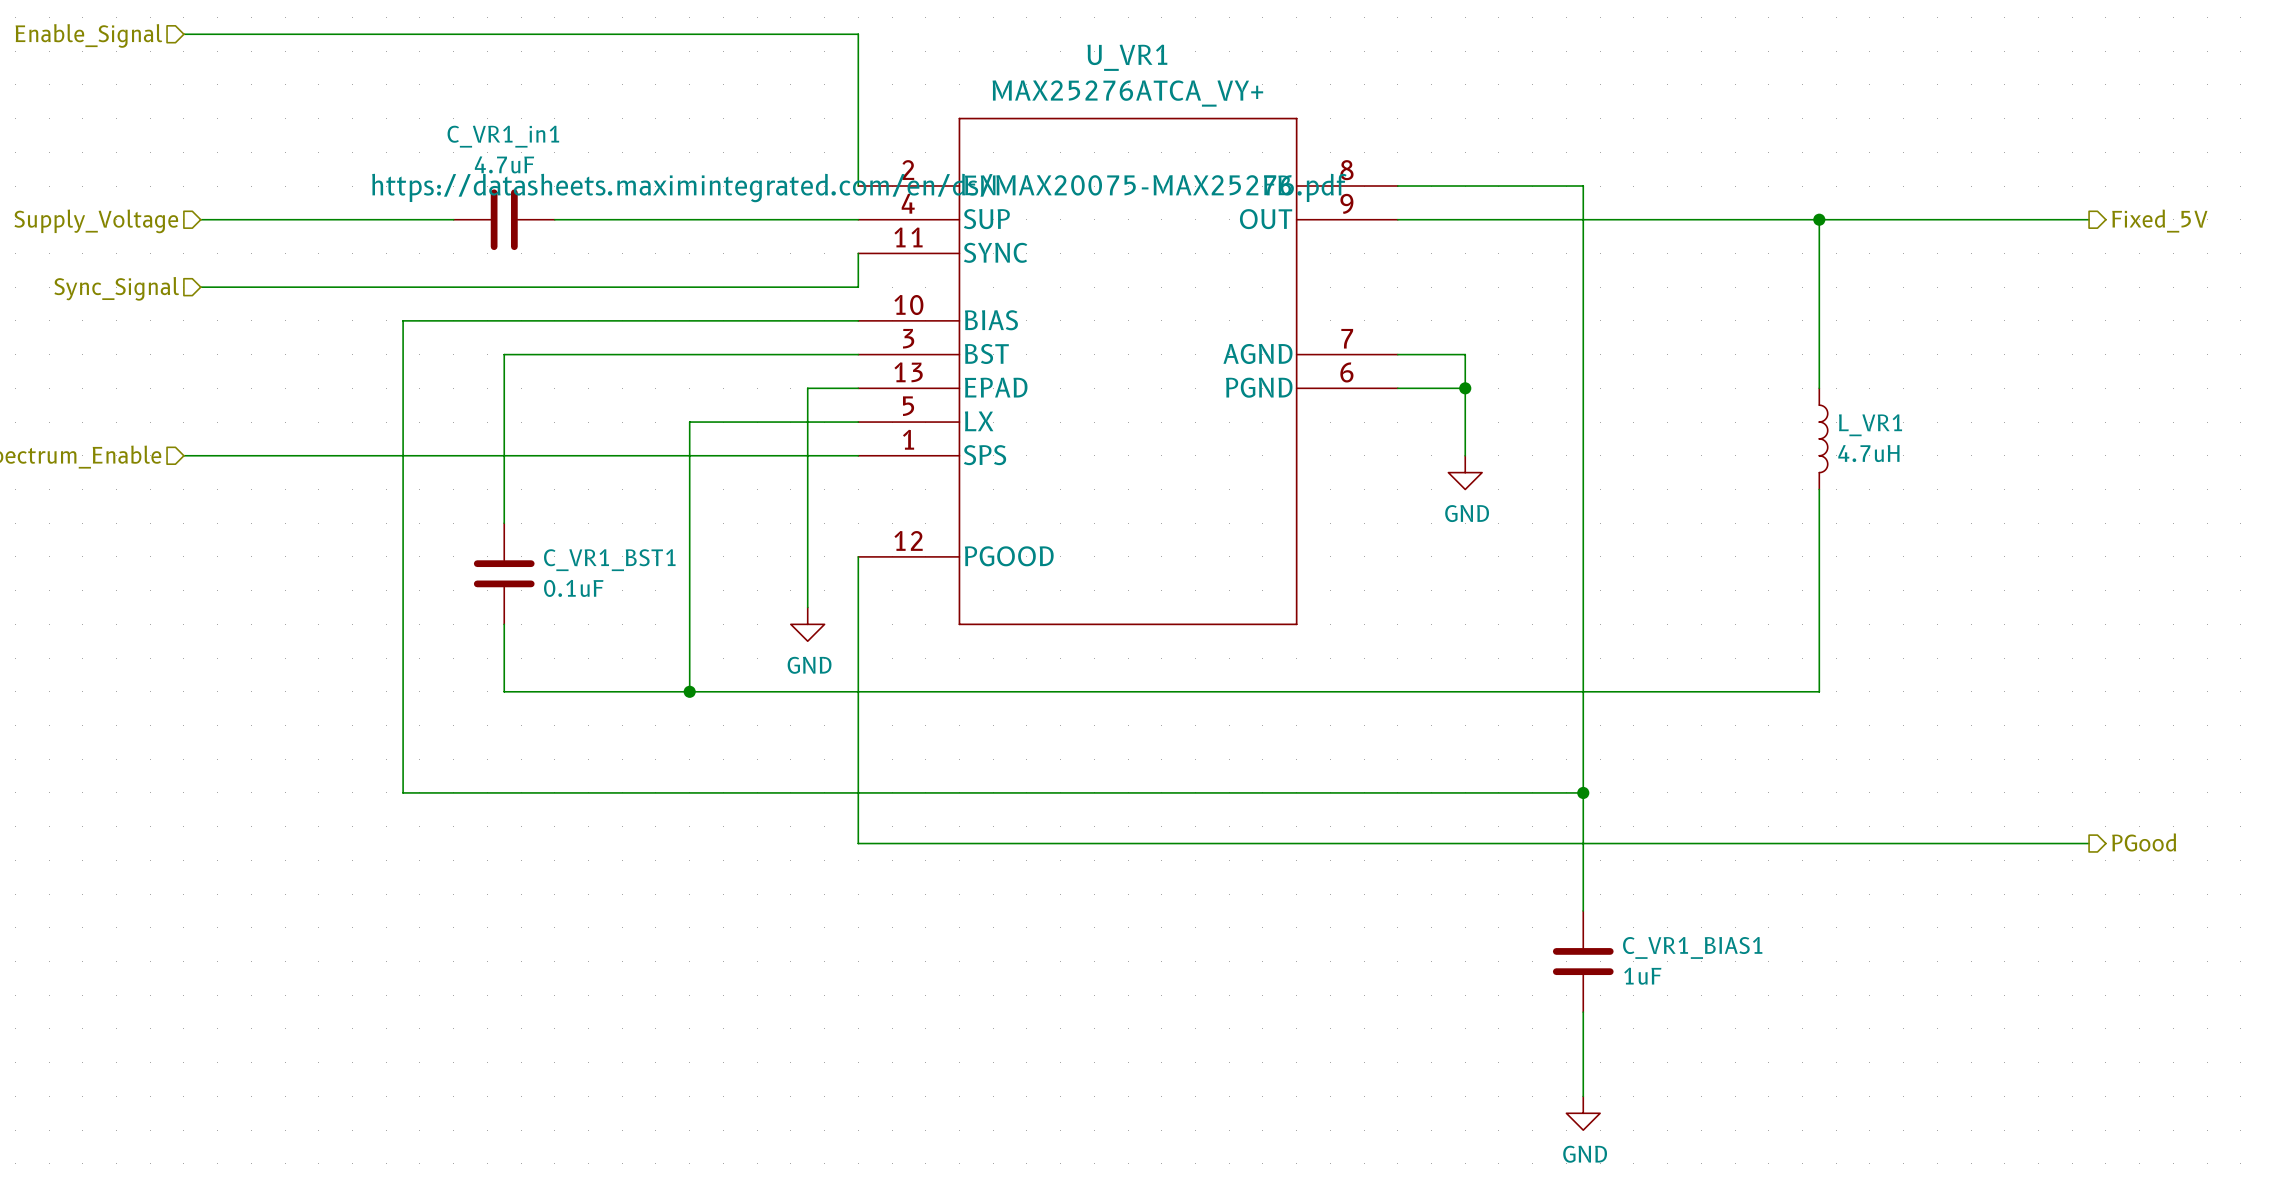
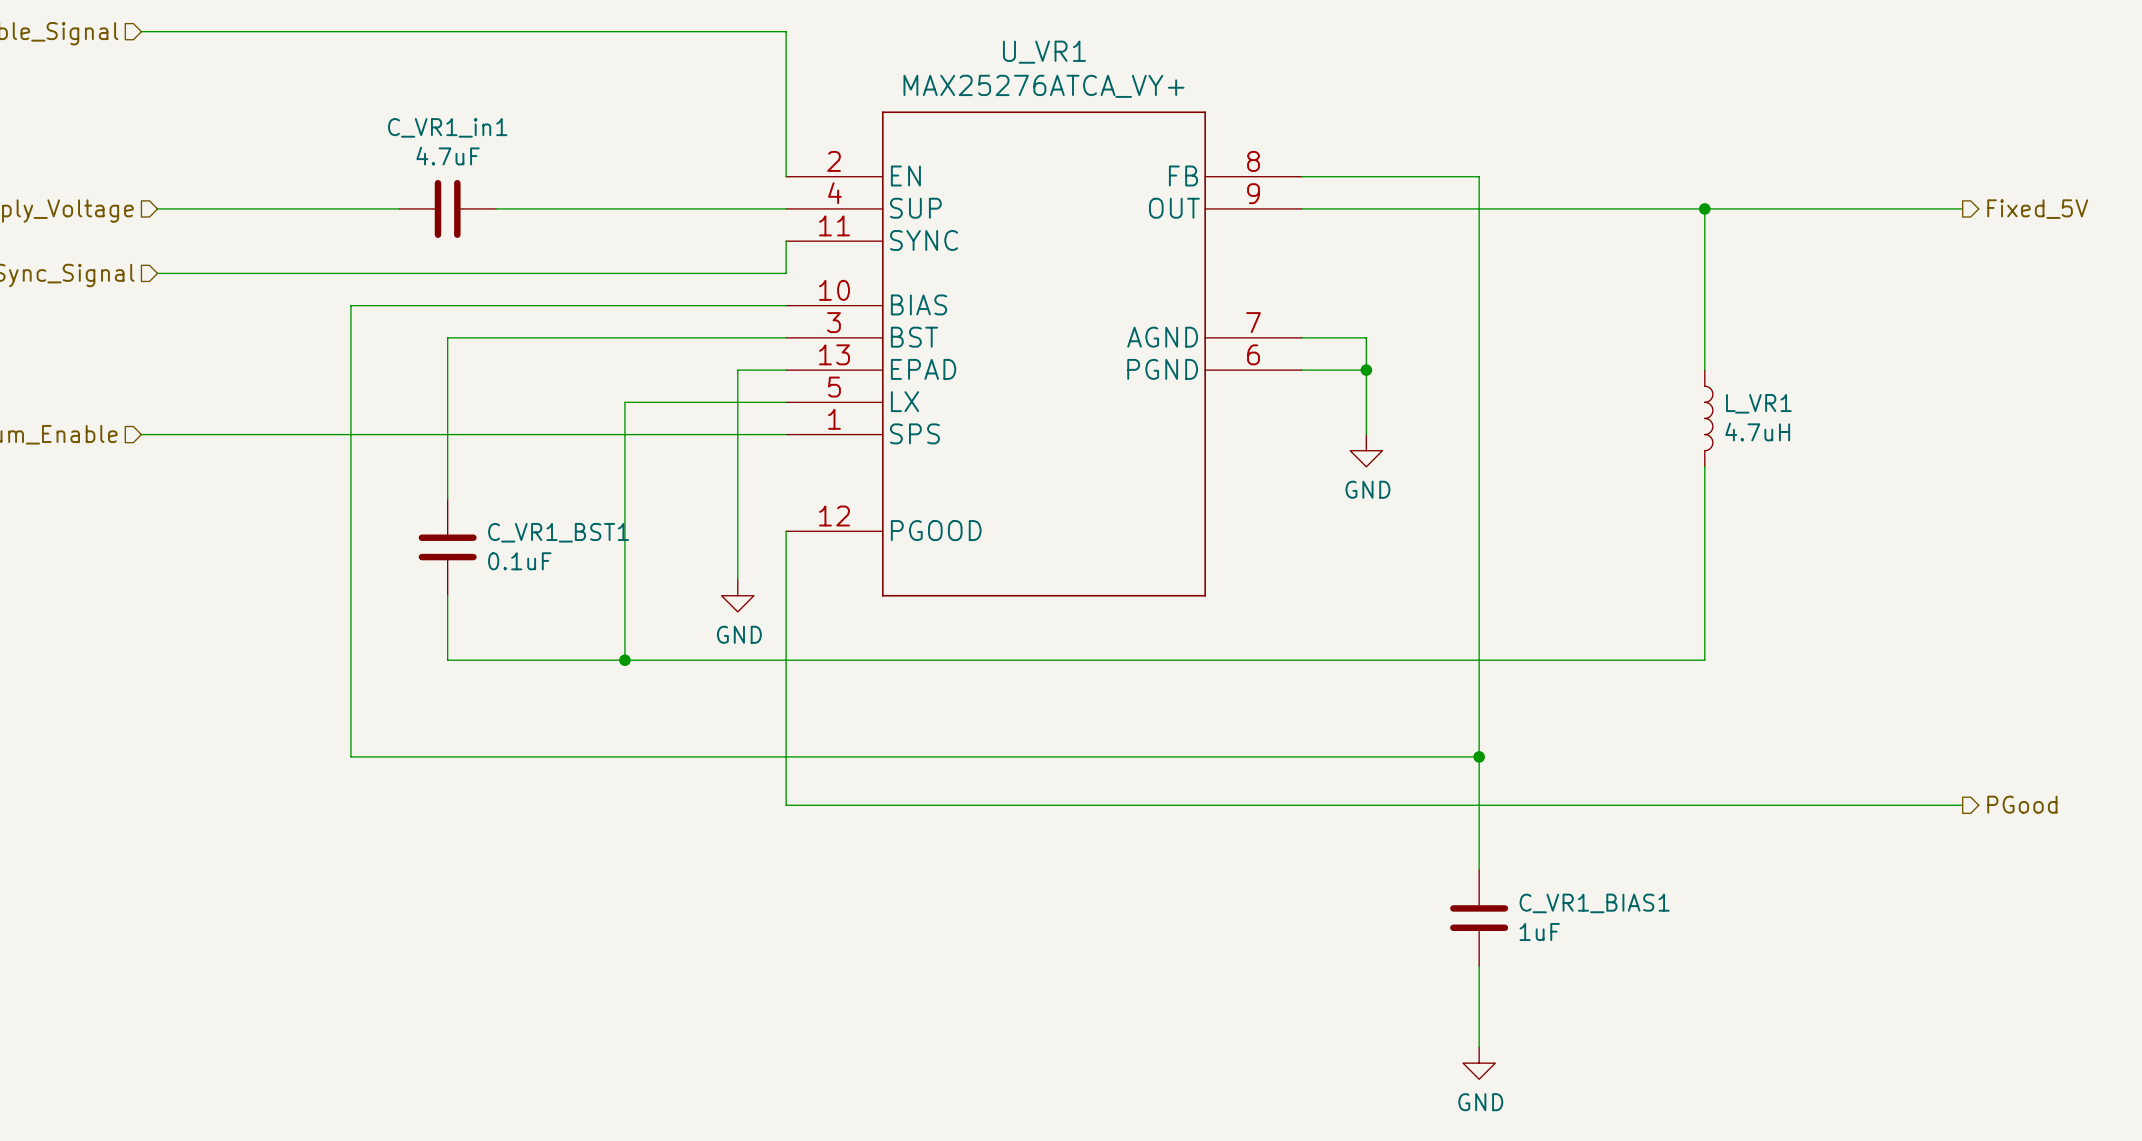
U_VR1 text: https://datasheets.maximintegrated.com/en/ds/MAX20075-MAX25276.pdf (859, 188) -> none

